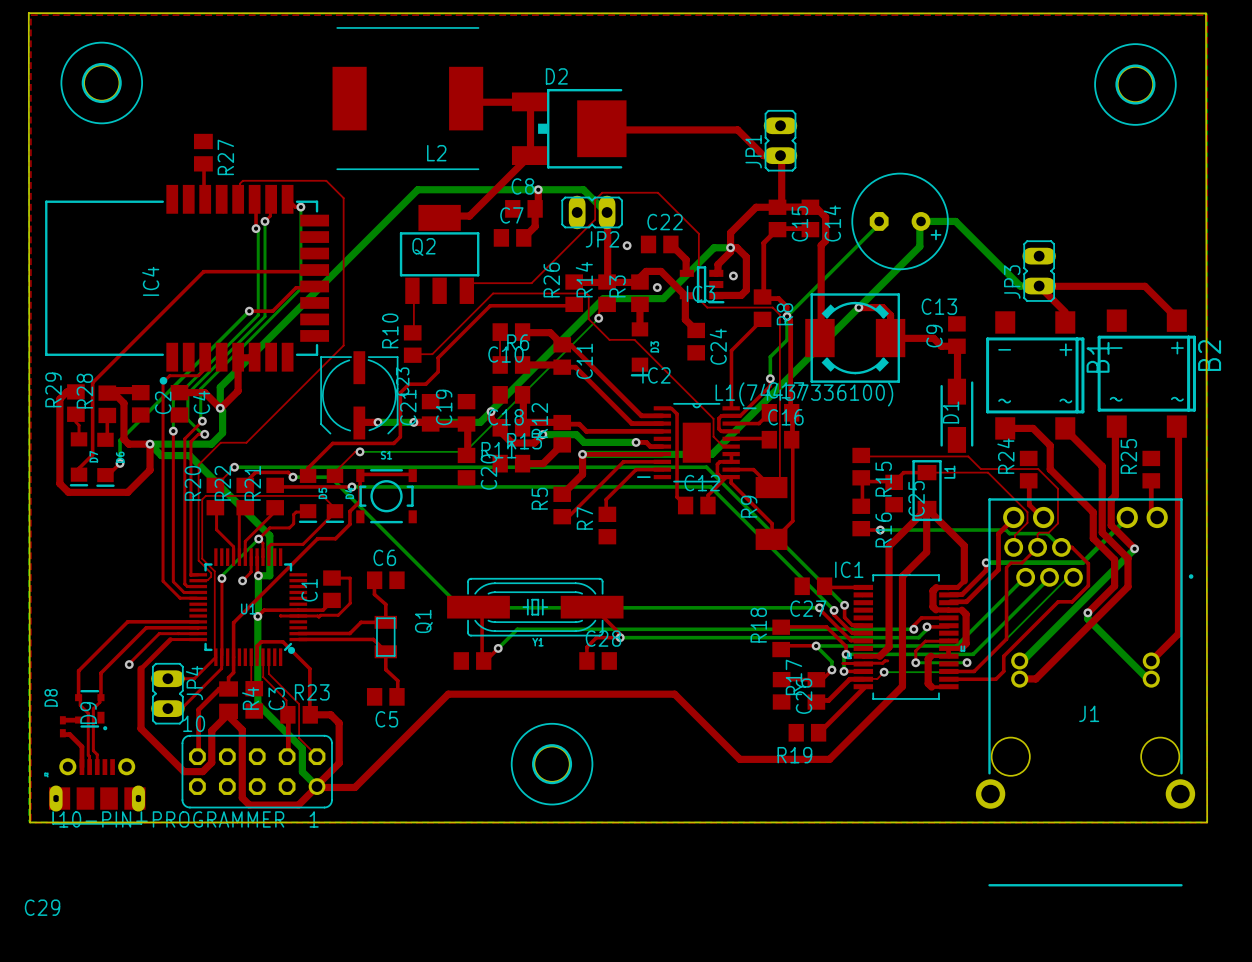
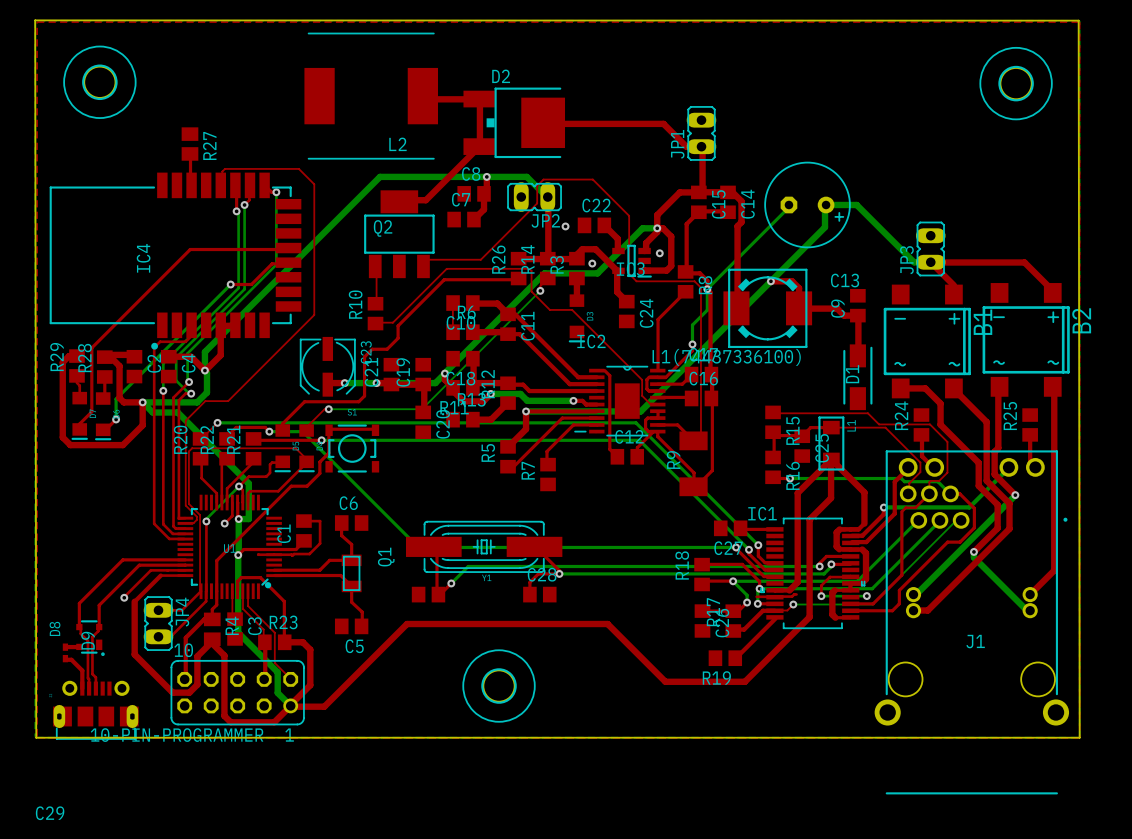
C23 footprint: [320, 351, 399, 440] -> [300, 336, 356, 397]

